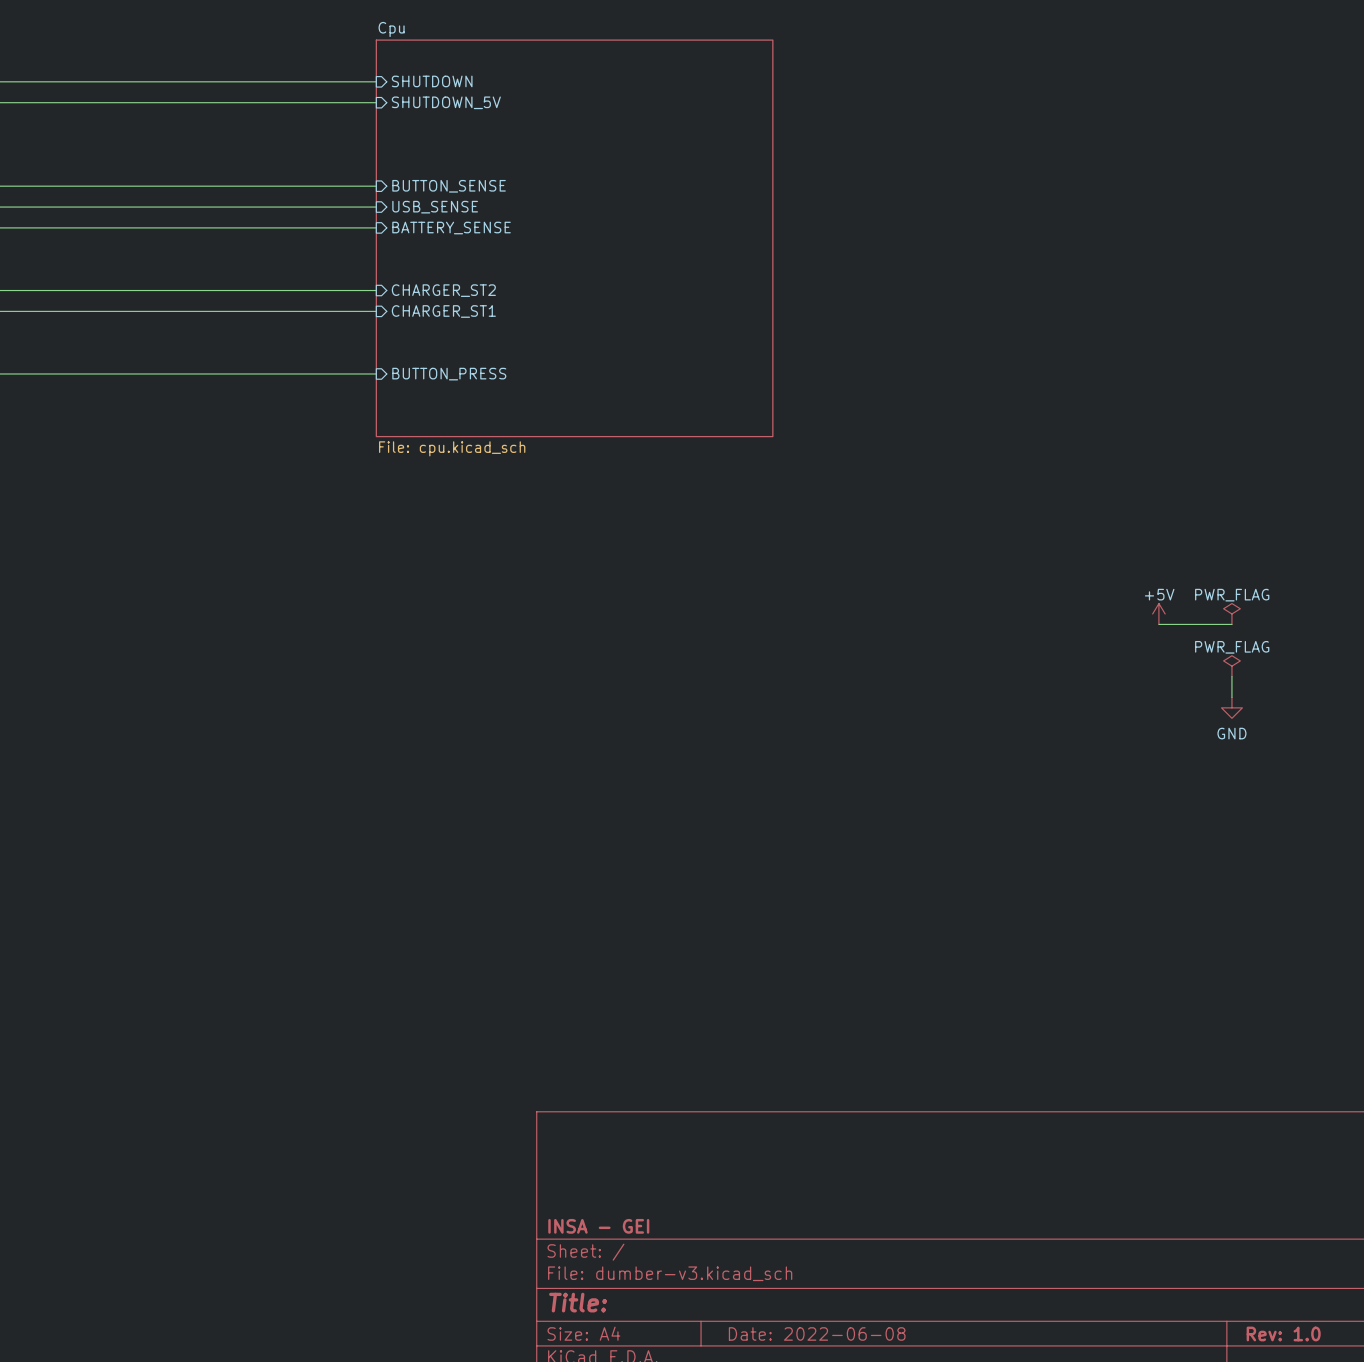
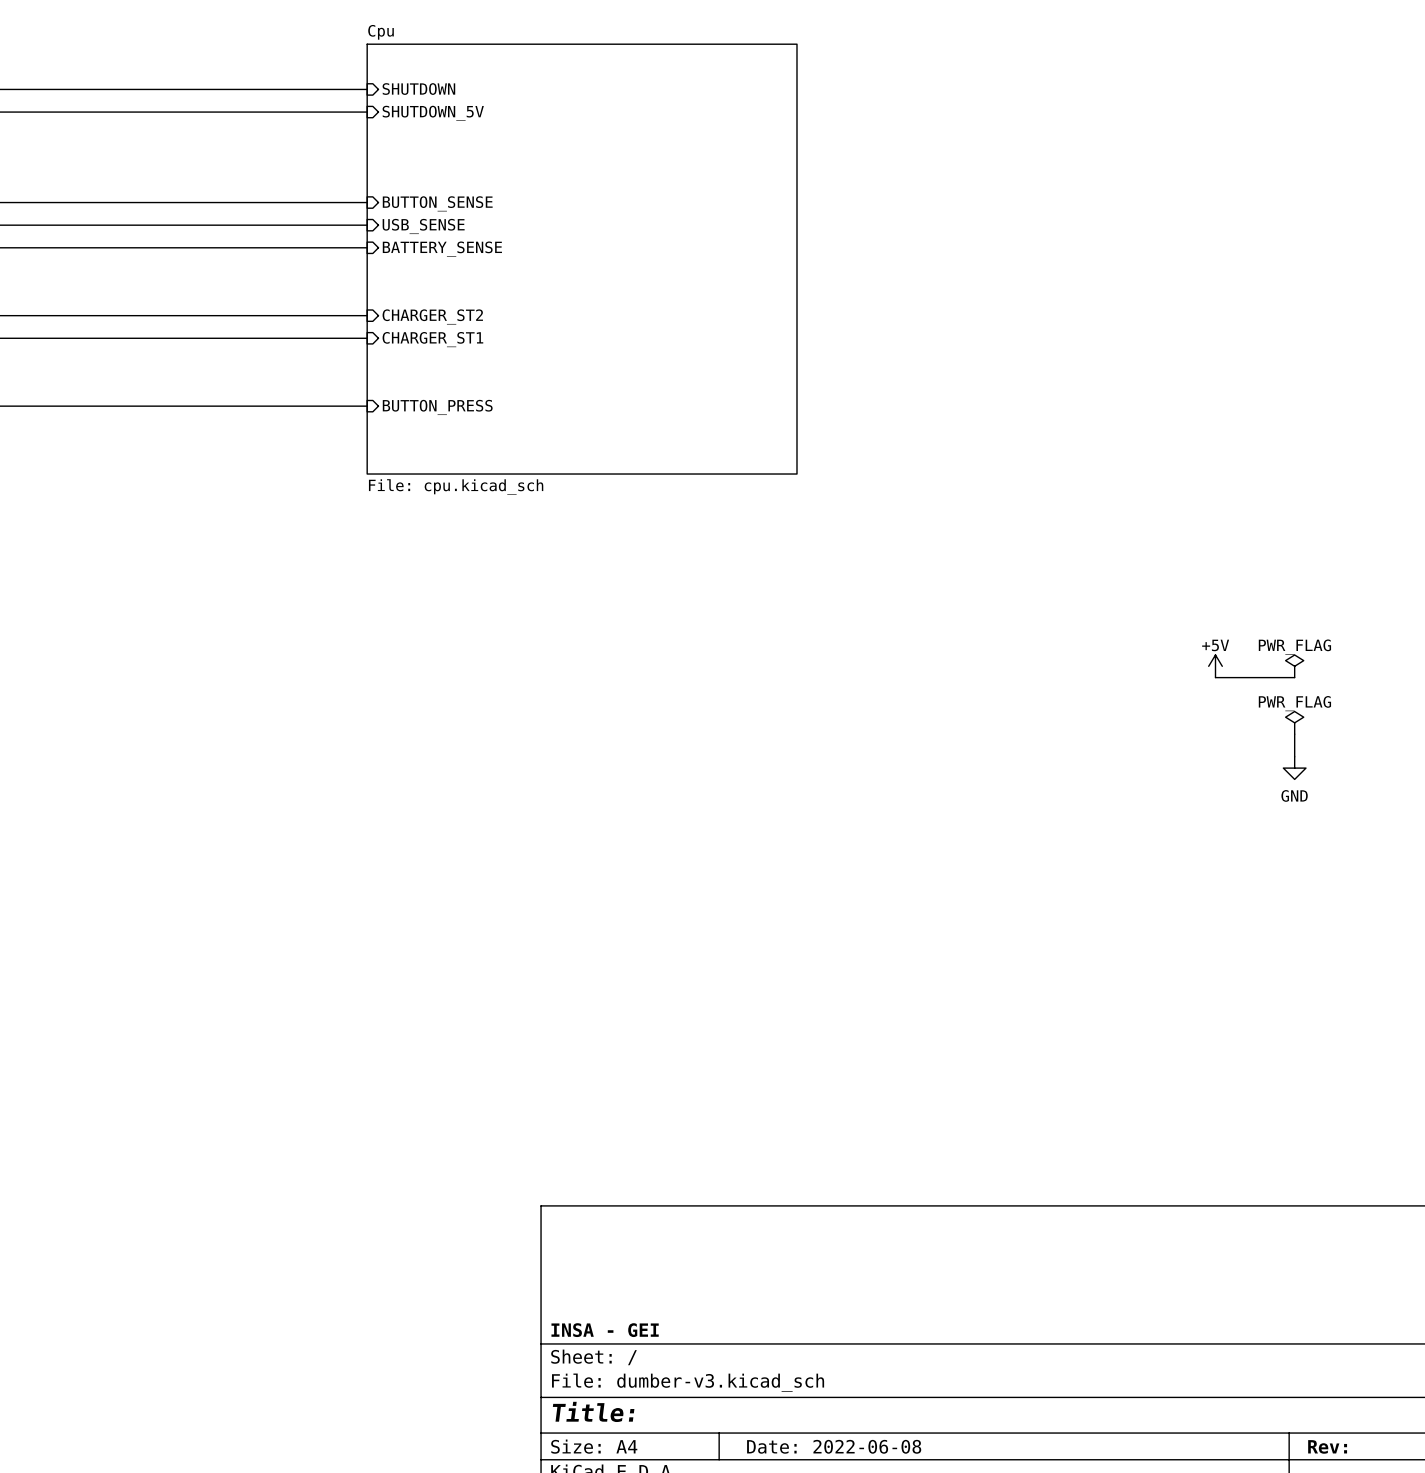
title block: Rev: 1.0 (1283, 1333) -> Rev: (1327, 1446)

